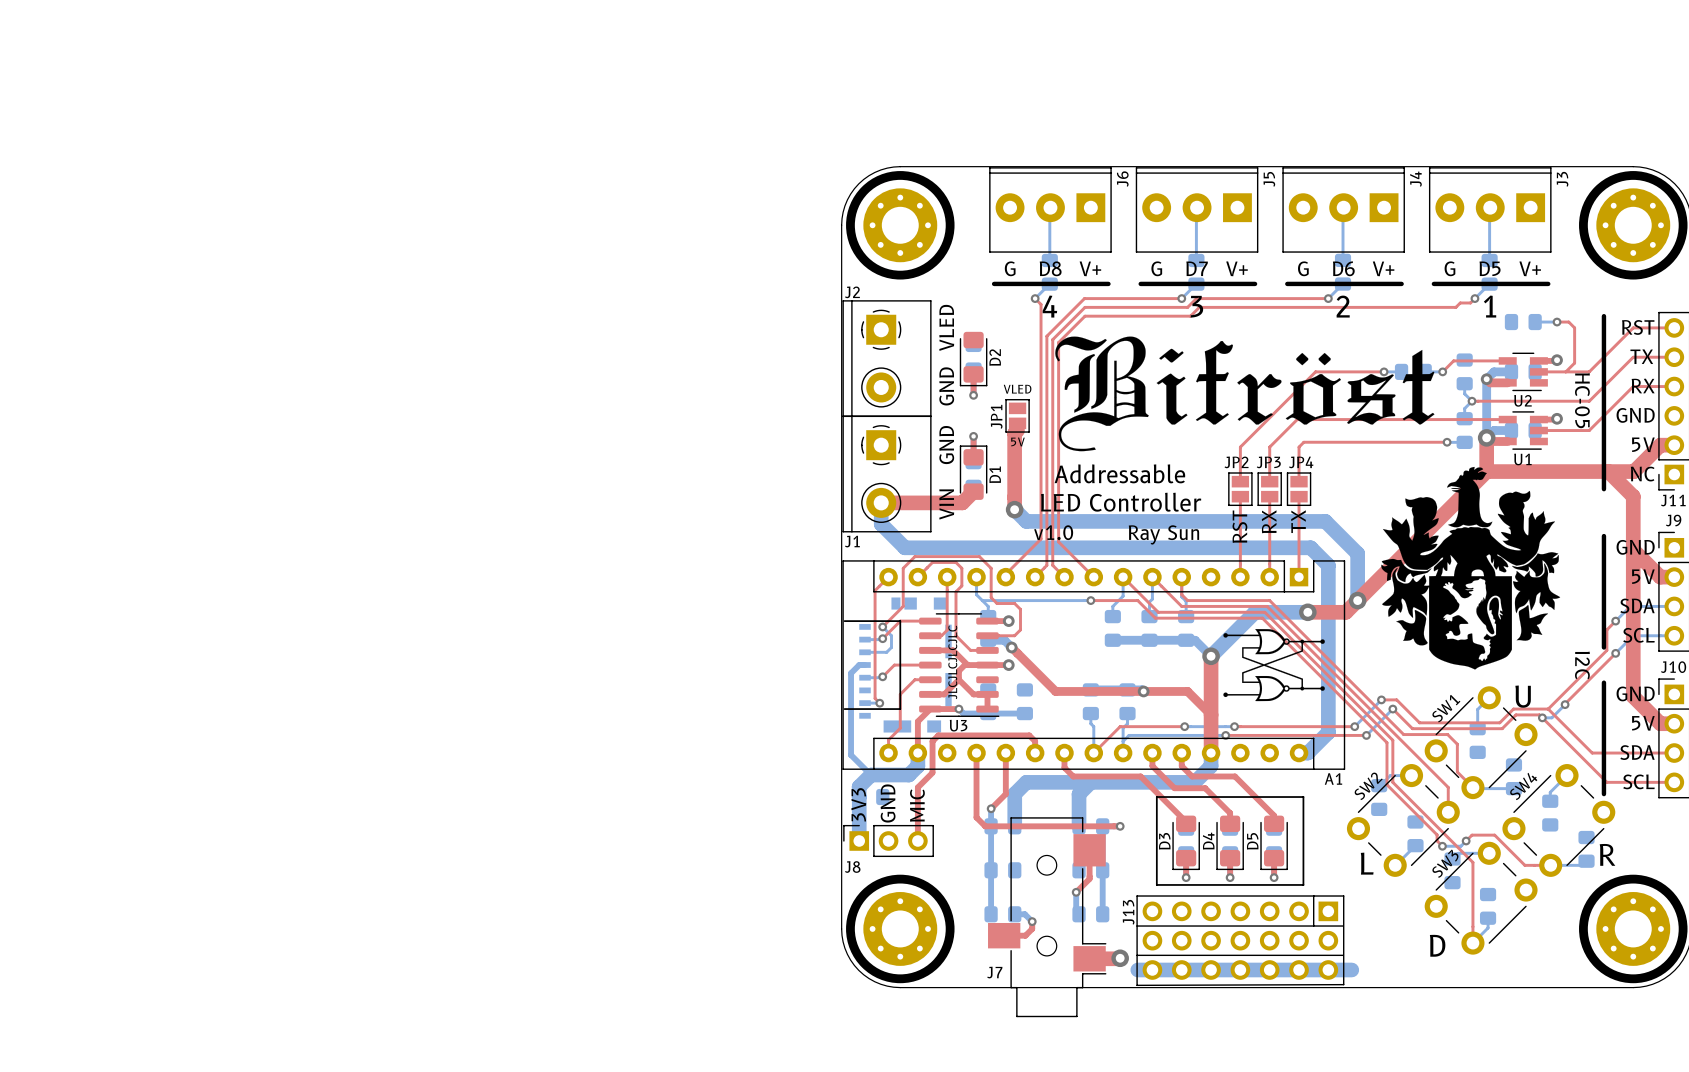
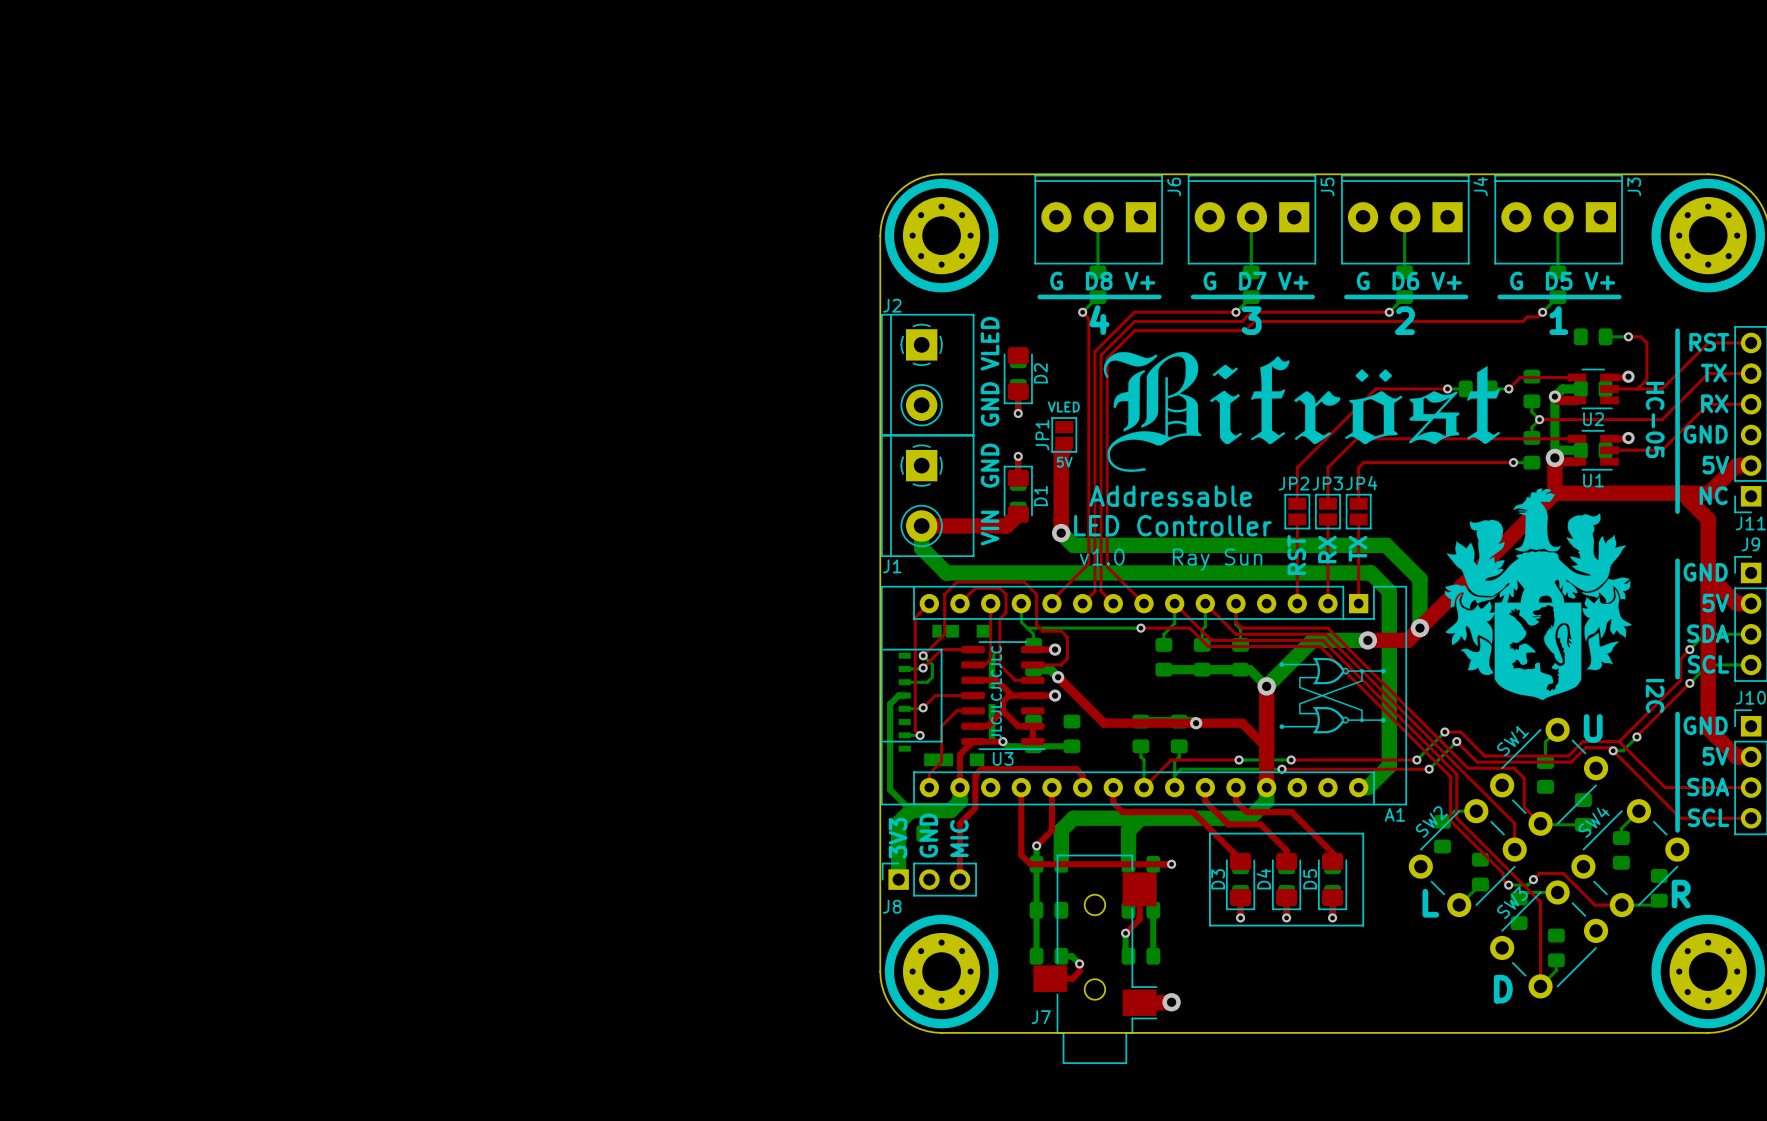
J13: (1240, 940) -> none
bottom track: (1137, 969) (1351, 969) -> none

